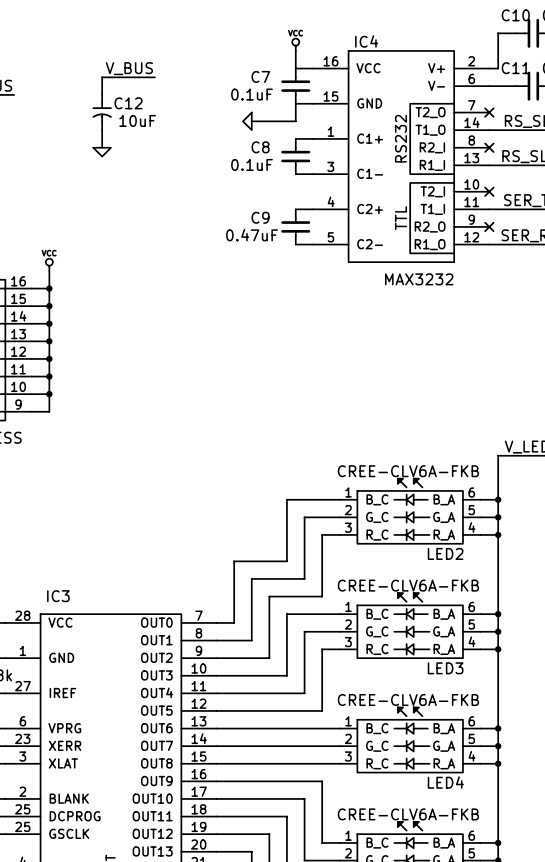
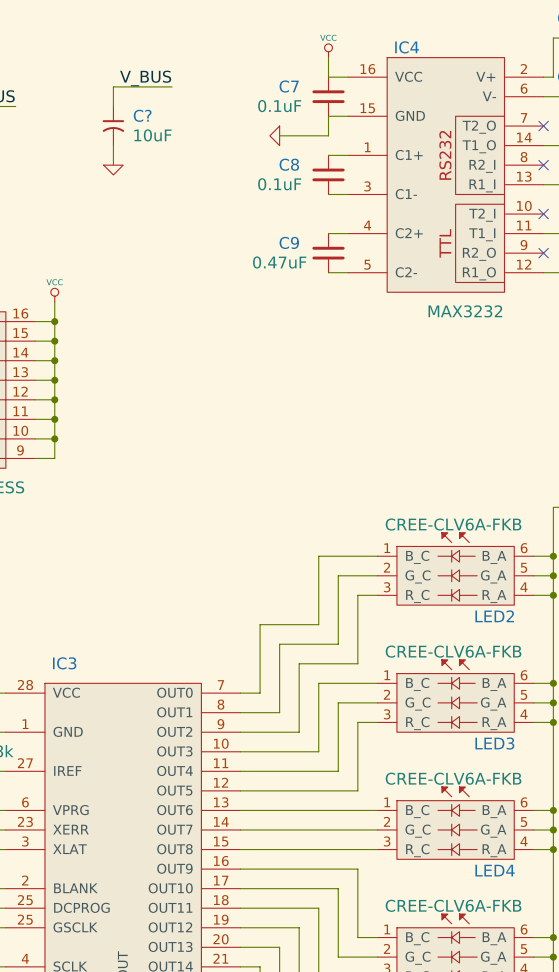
C12 name: C12 (128, 103) -> C? (142, 115)

